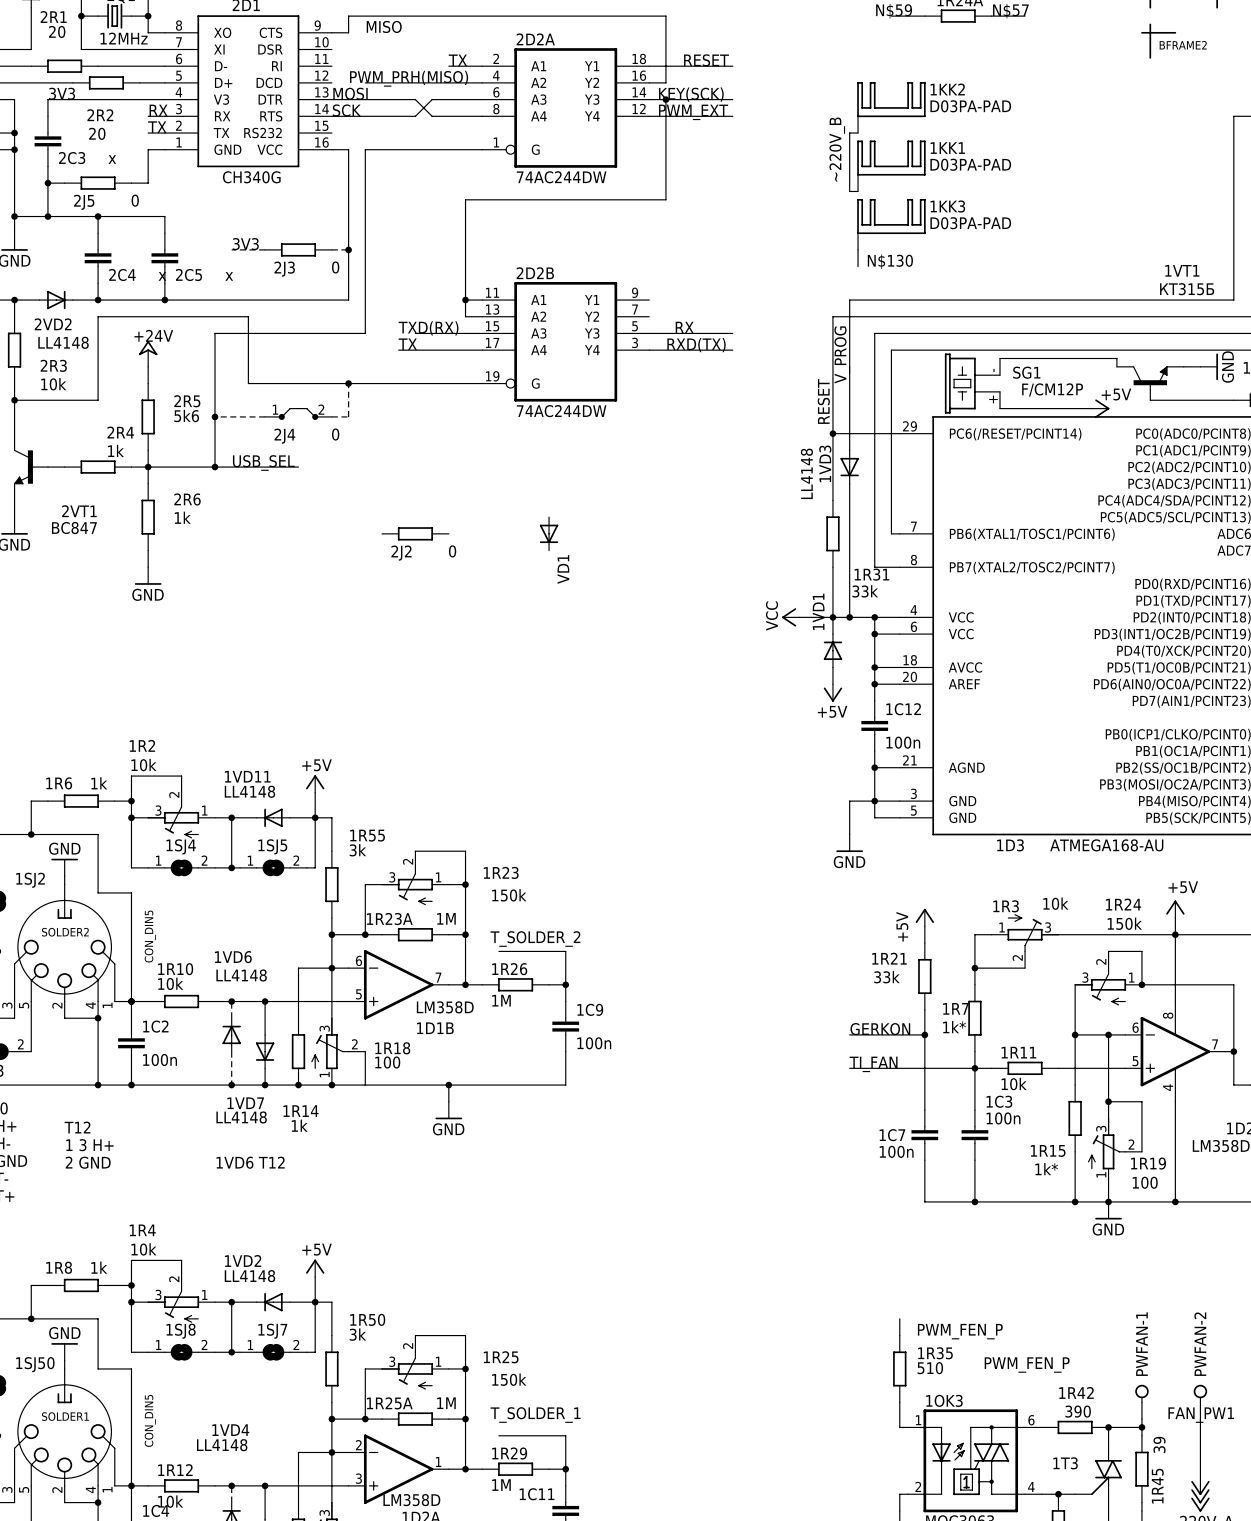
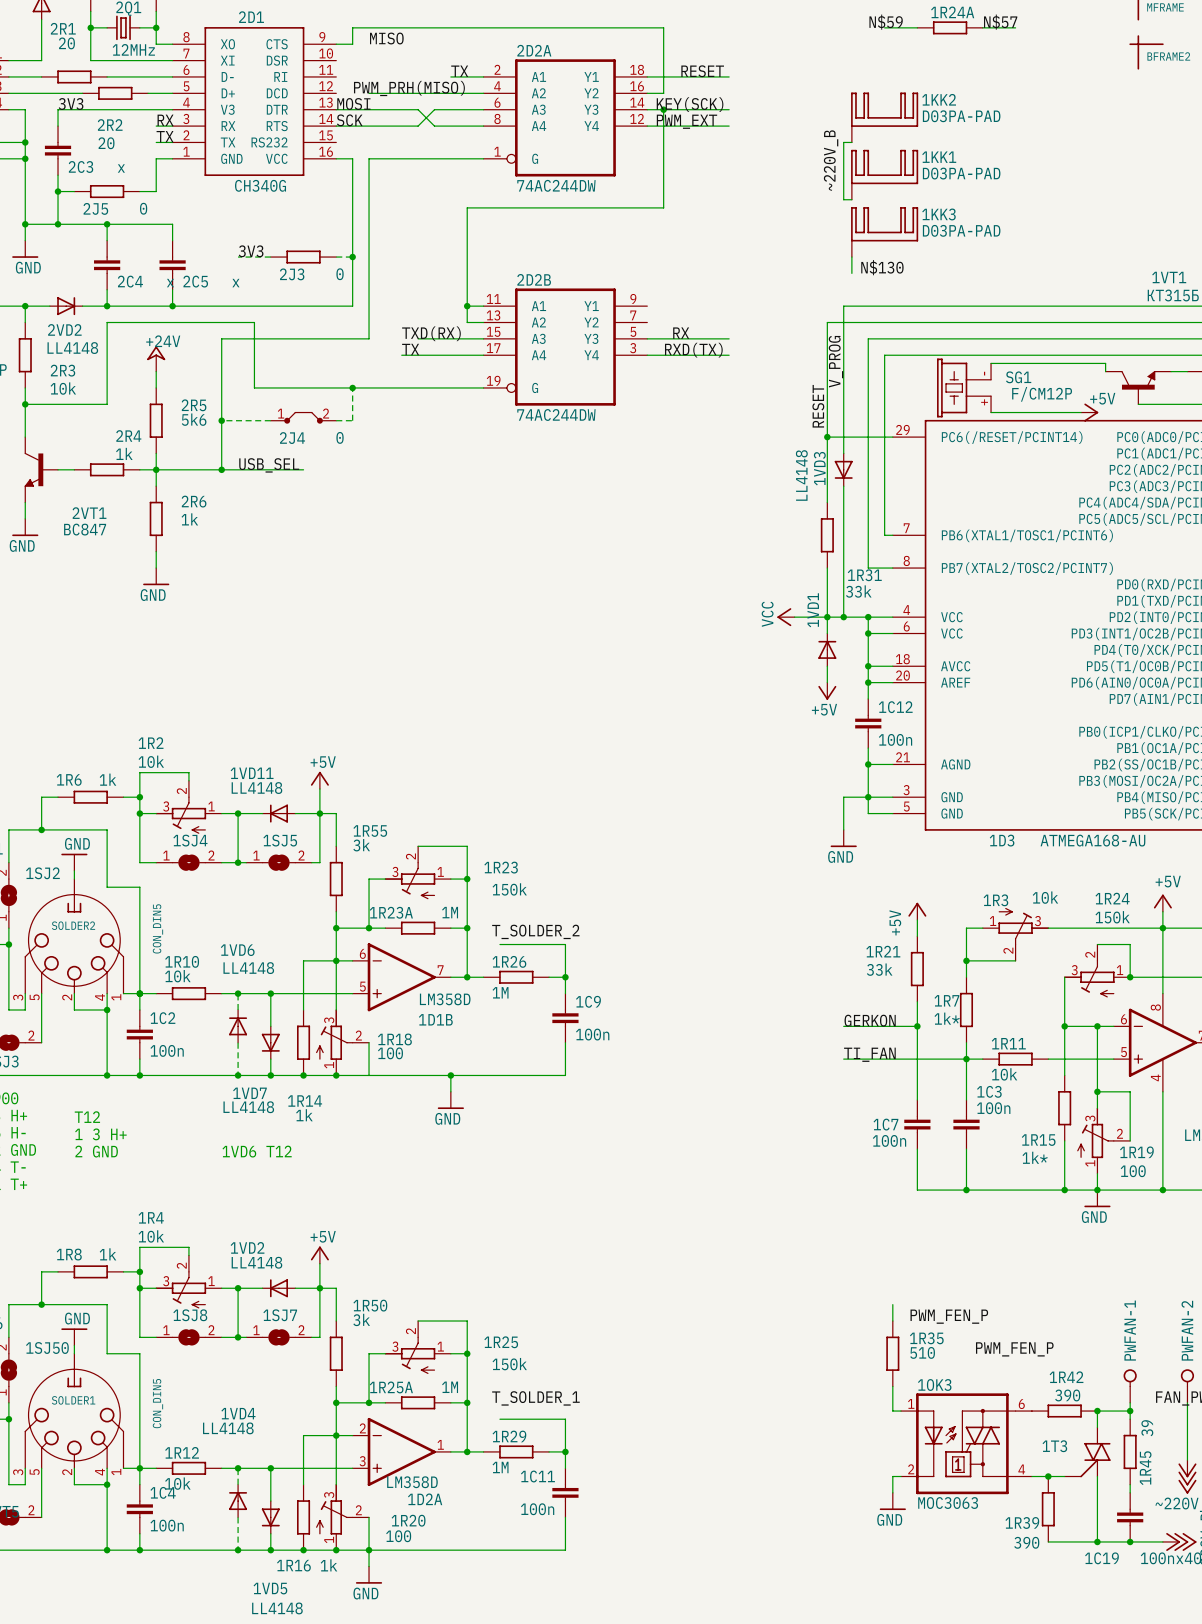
2J2: 0 (415, 533) -> none
VD1: (549, 533) -> none

